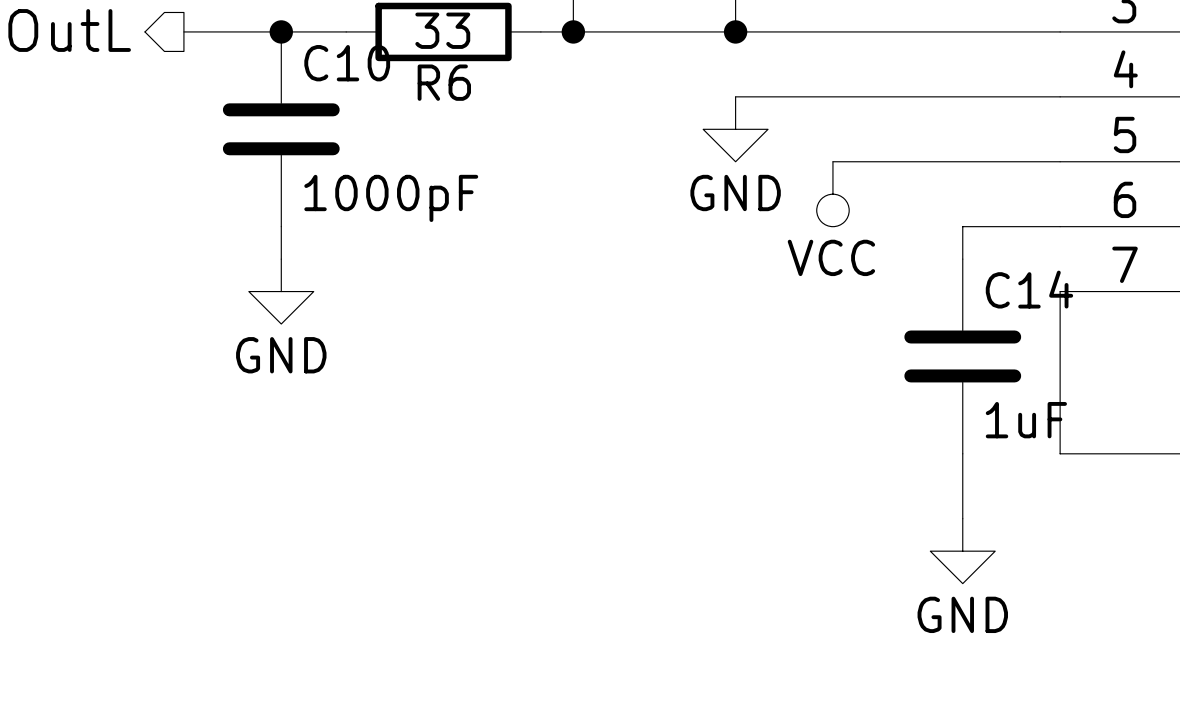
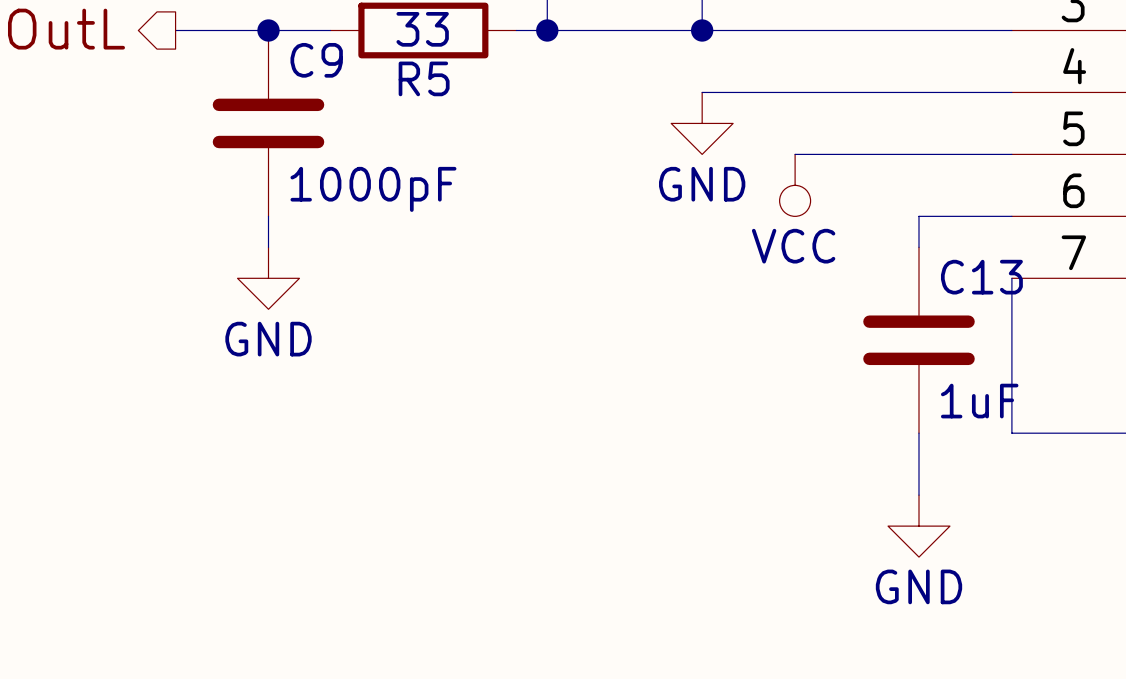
C10 name: C10 (347, 63) -> C9 (316, 60)
R6 name: R6 (444, 82) -> R5 (424, 78)
C14 name: C14 (1029, 289) -> C13 (981, 277)

